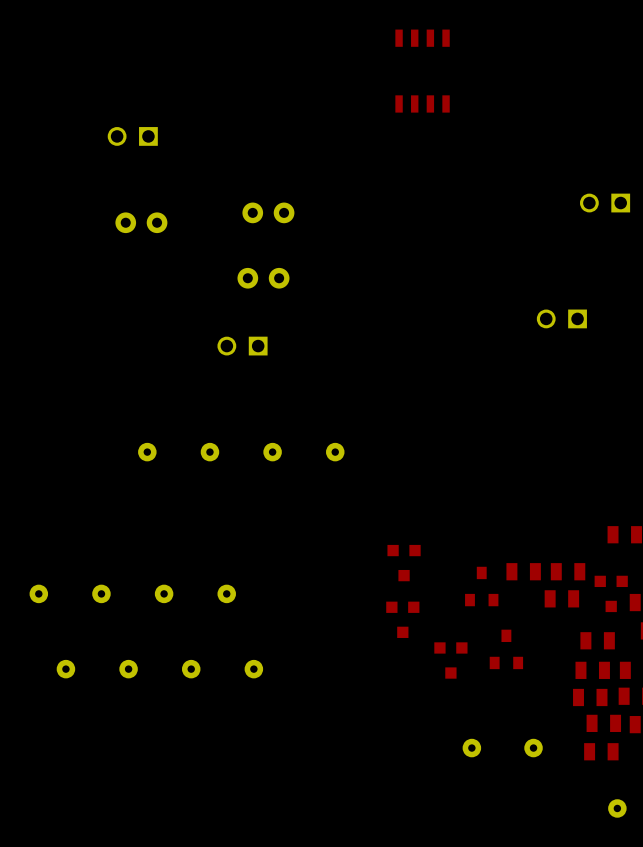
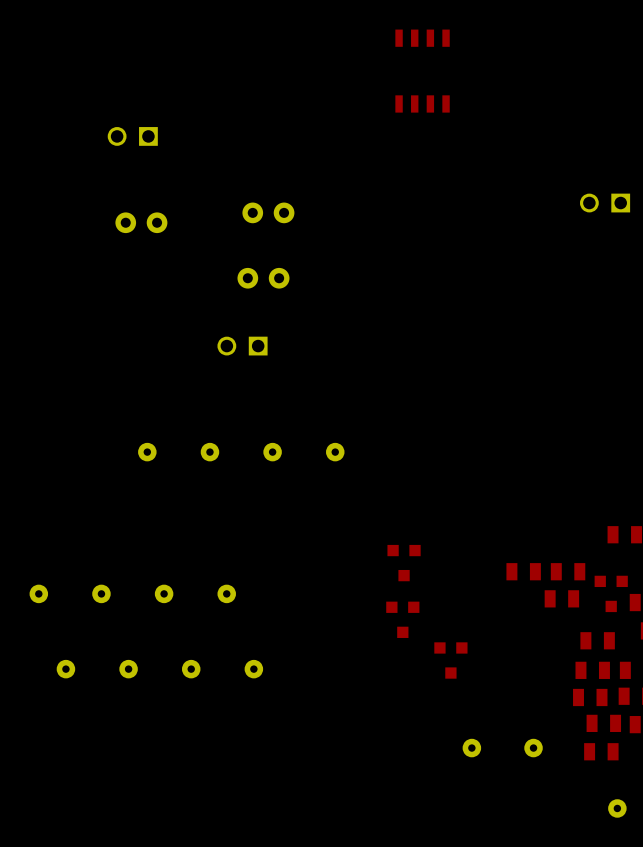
part: (561, 318) -> none
part: (481, 586) -> none
part: (506, 649) -> none

